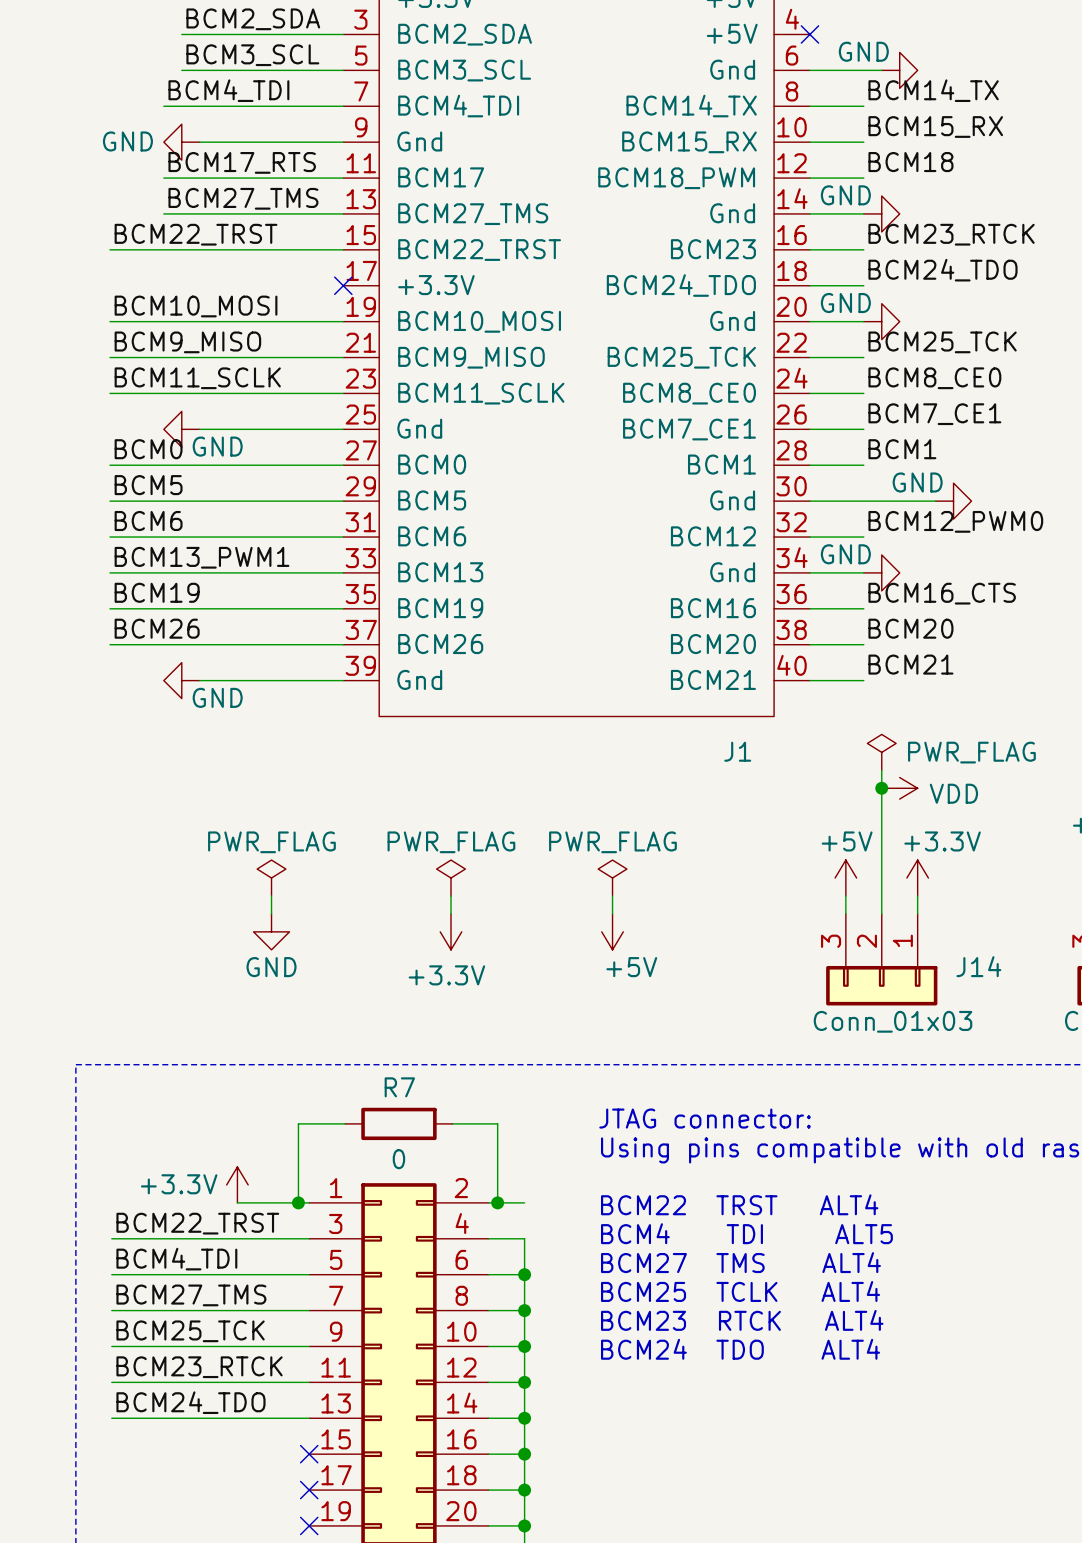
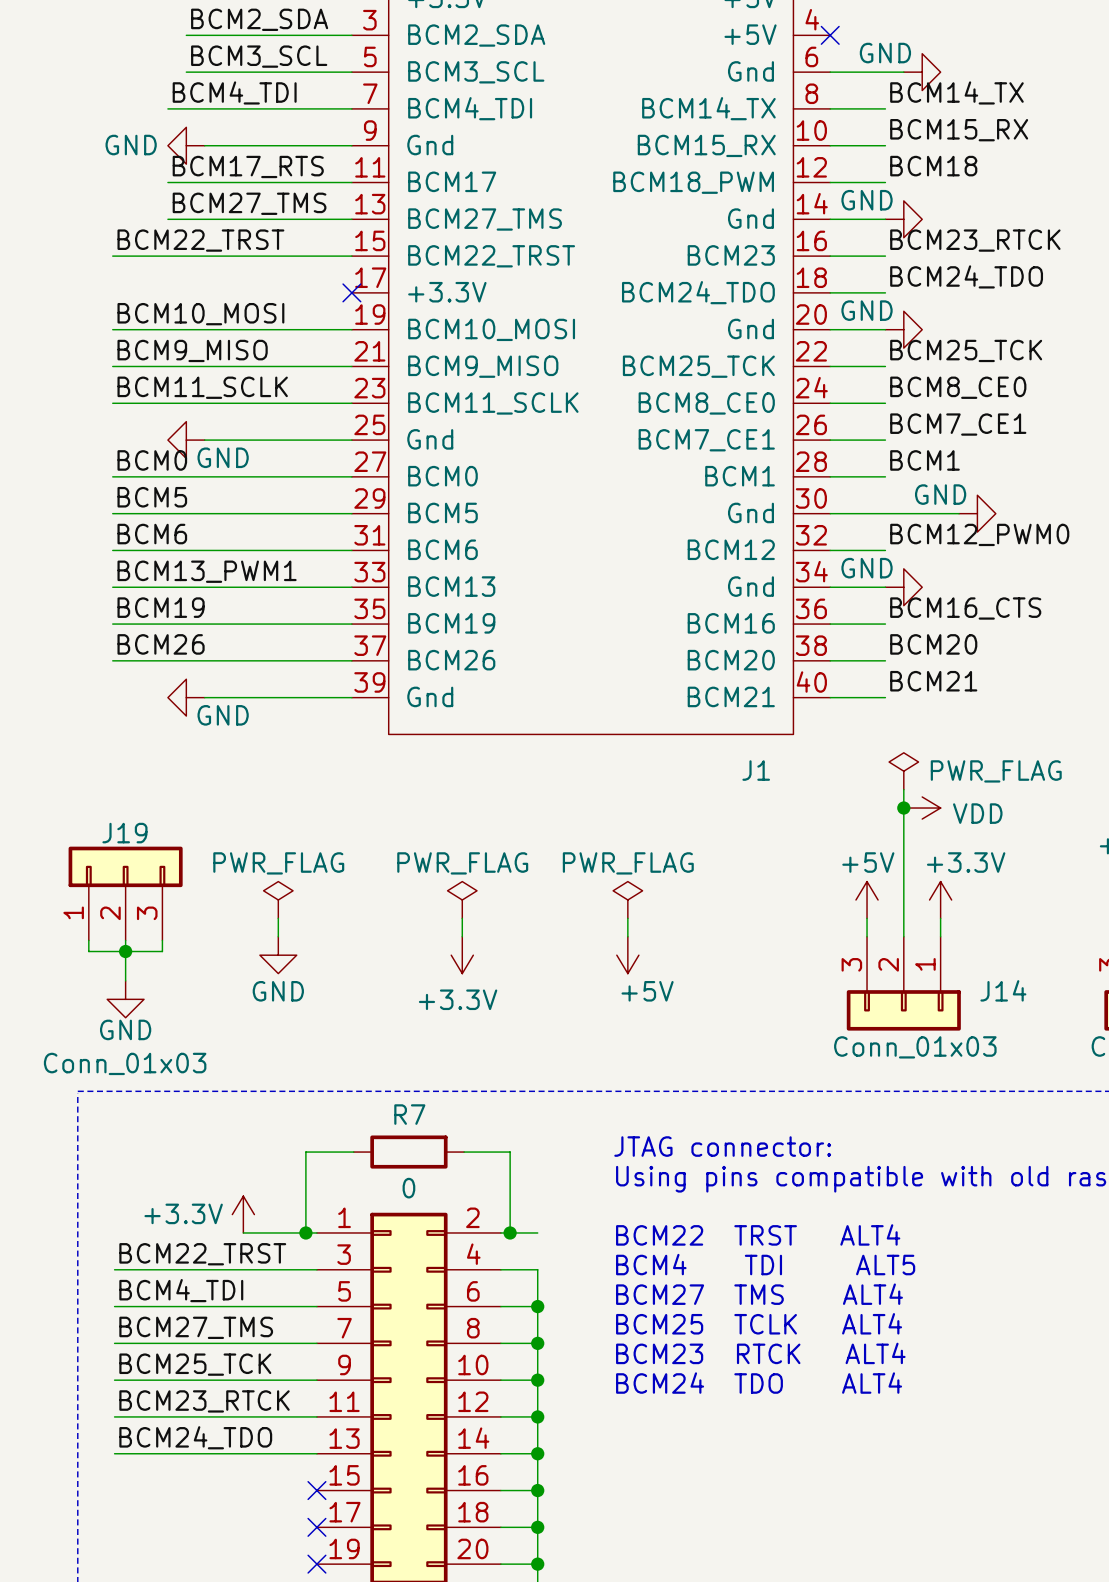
J19: none -> Conn_01x03 (125, 893)
wire: none -> (88, 940) (88, 951) (162, 951) (162, 940)
wire: none -> (125, 940) (125, 980)
junction: none -> (125, 951)
power symbol: none -> GND (125, 999)

